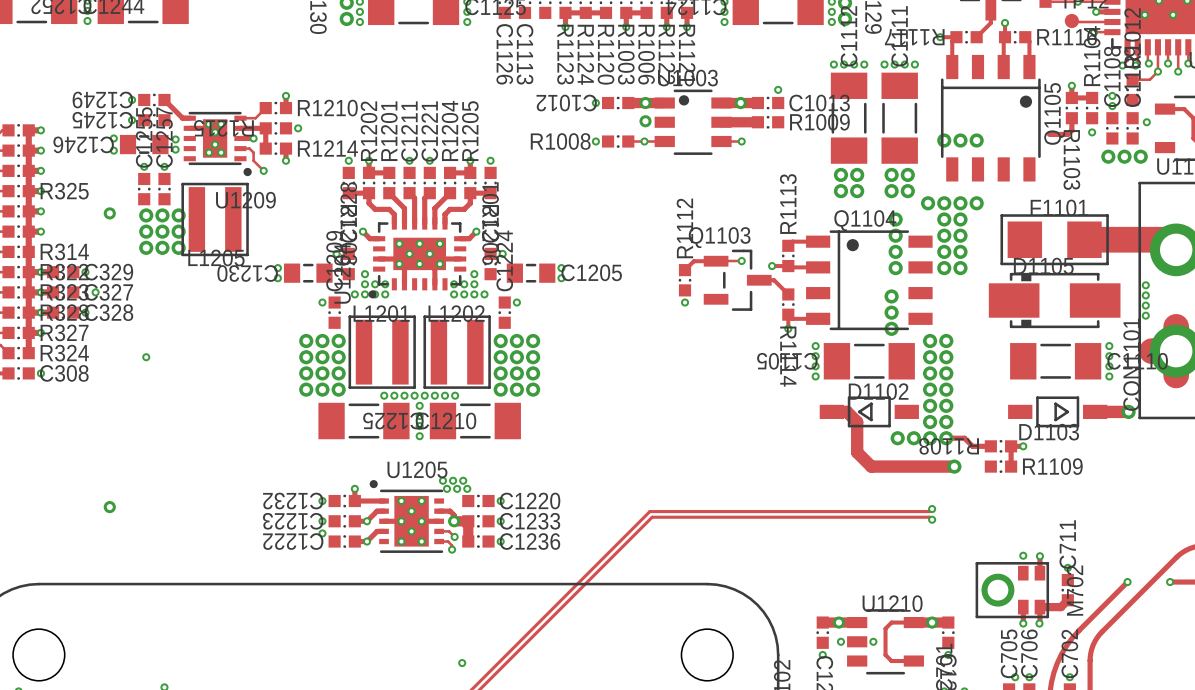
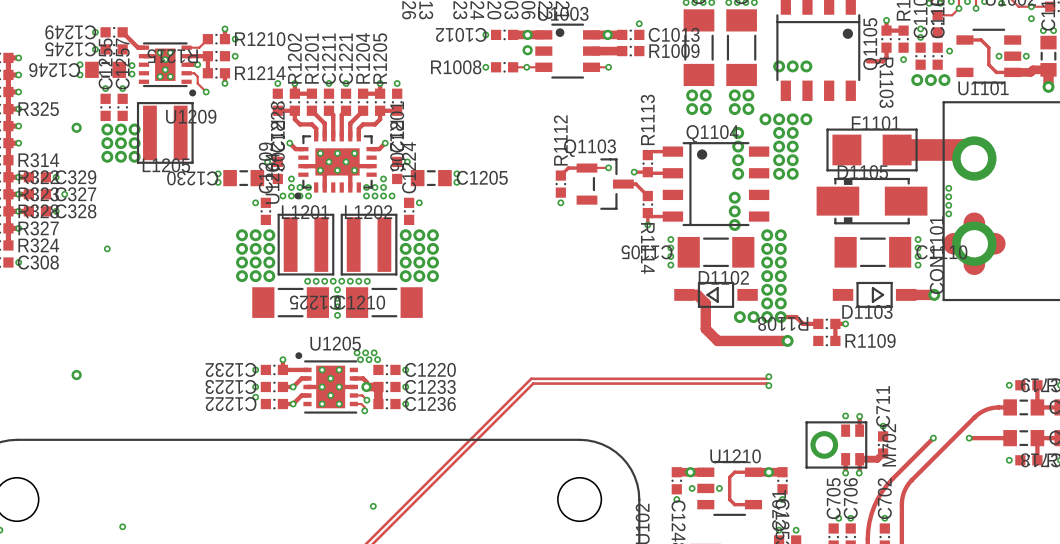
via: none -> (235, 39)

